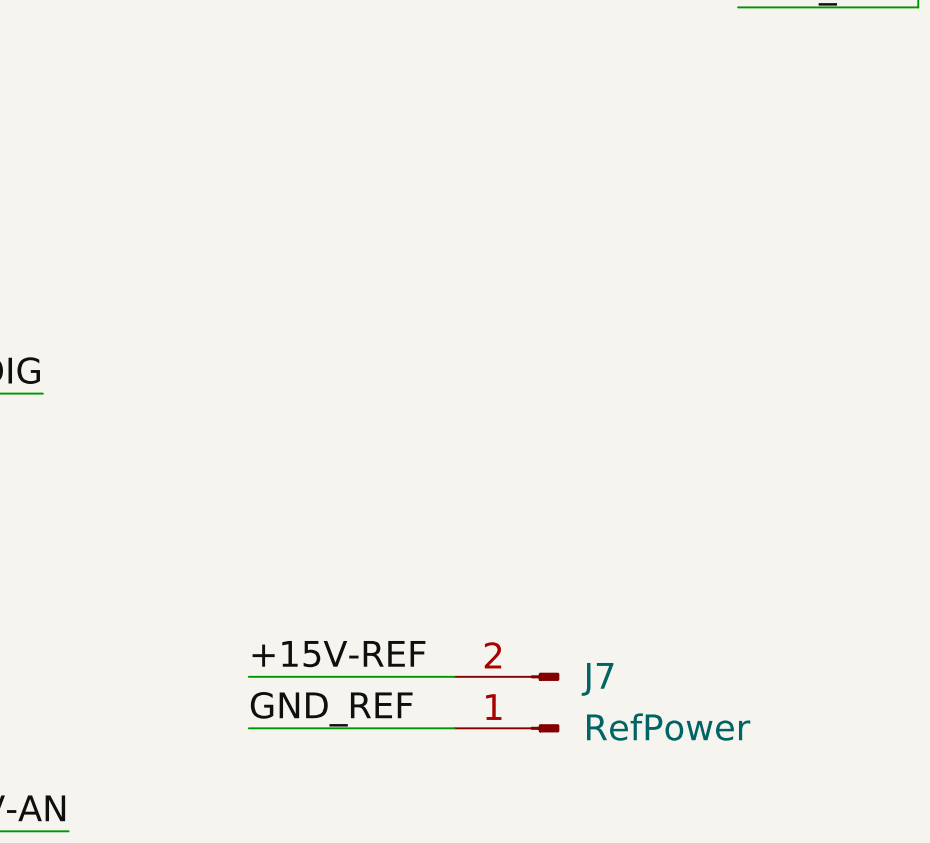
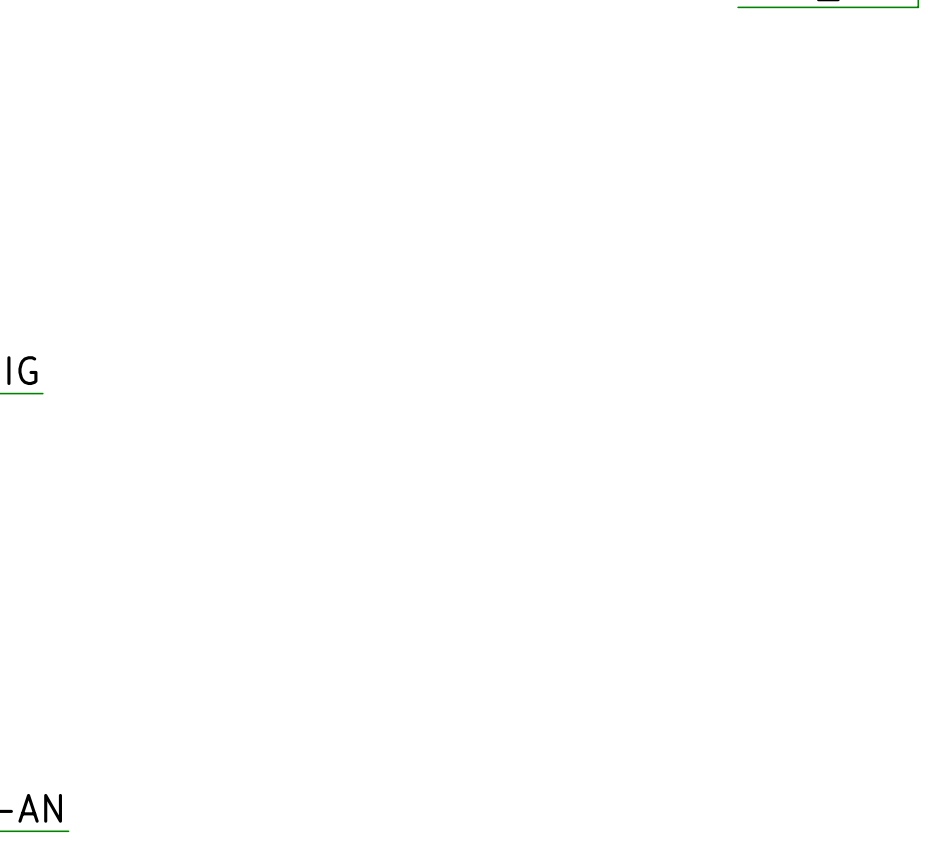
label: +15V-REF (338, 654) -> none
wire: (248, 676) (454, 676) -> none
J7: RefPower (507, 702) -> none
label: GND_REF (331, 709) -> none
wire: (248, 728) (454, 728) -> none

